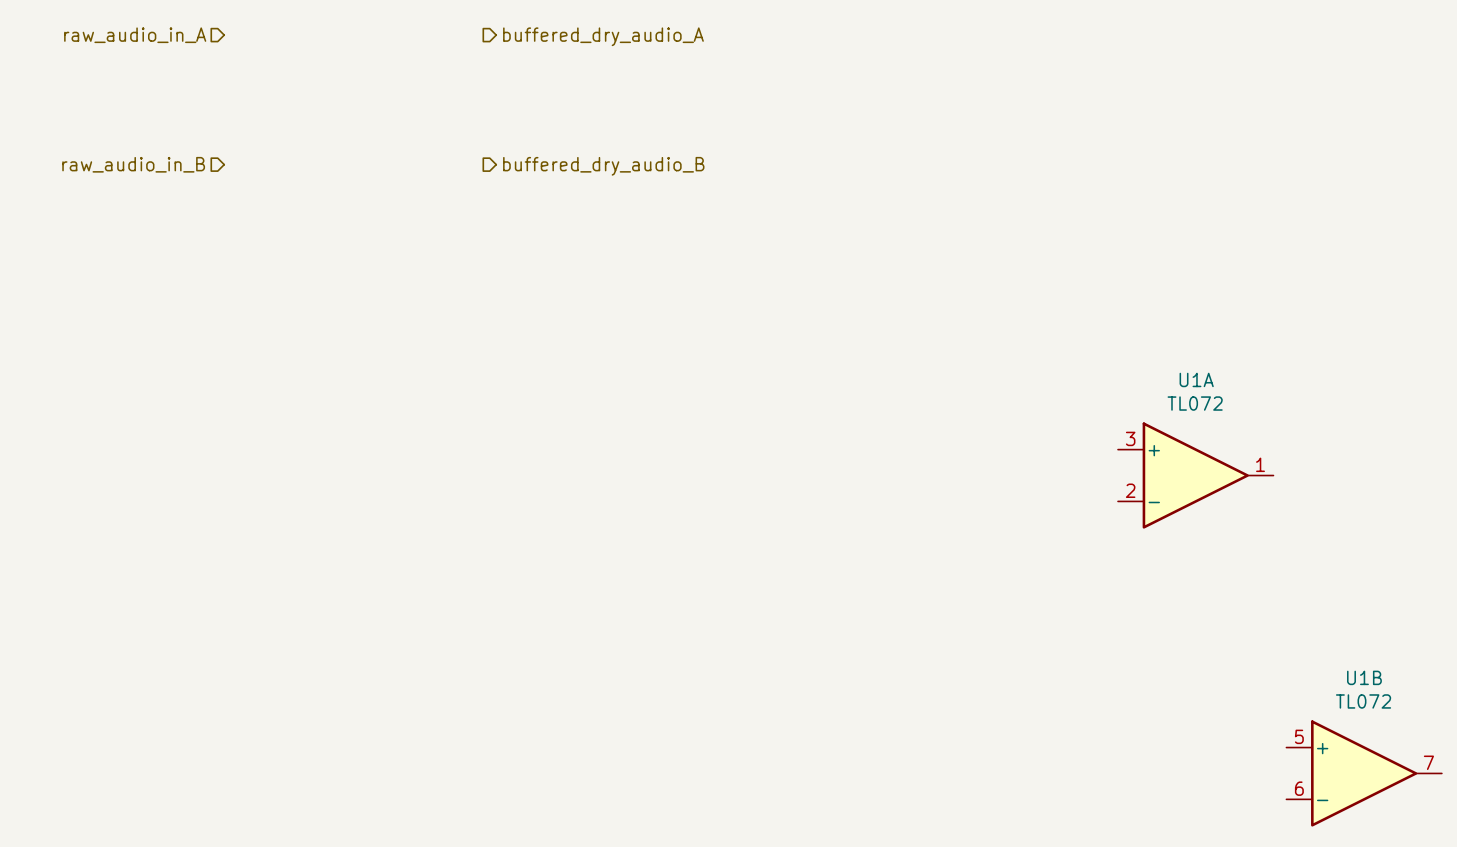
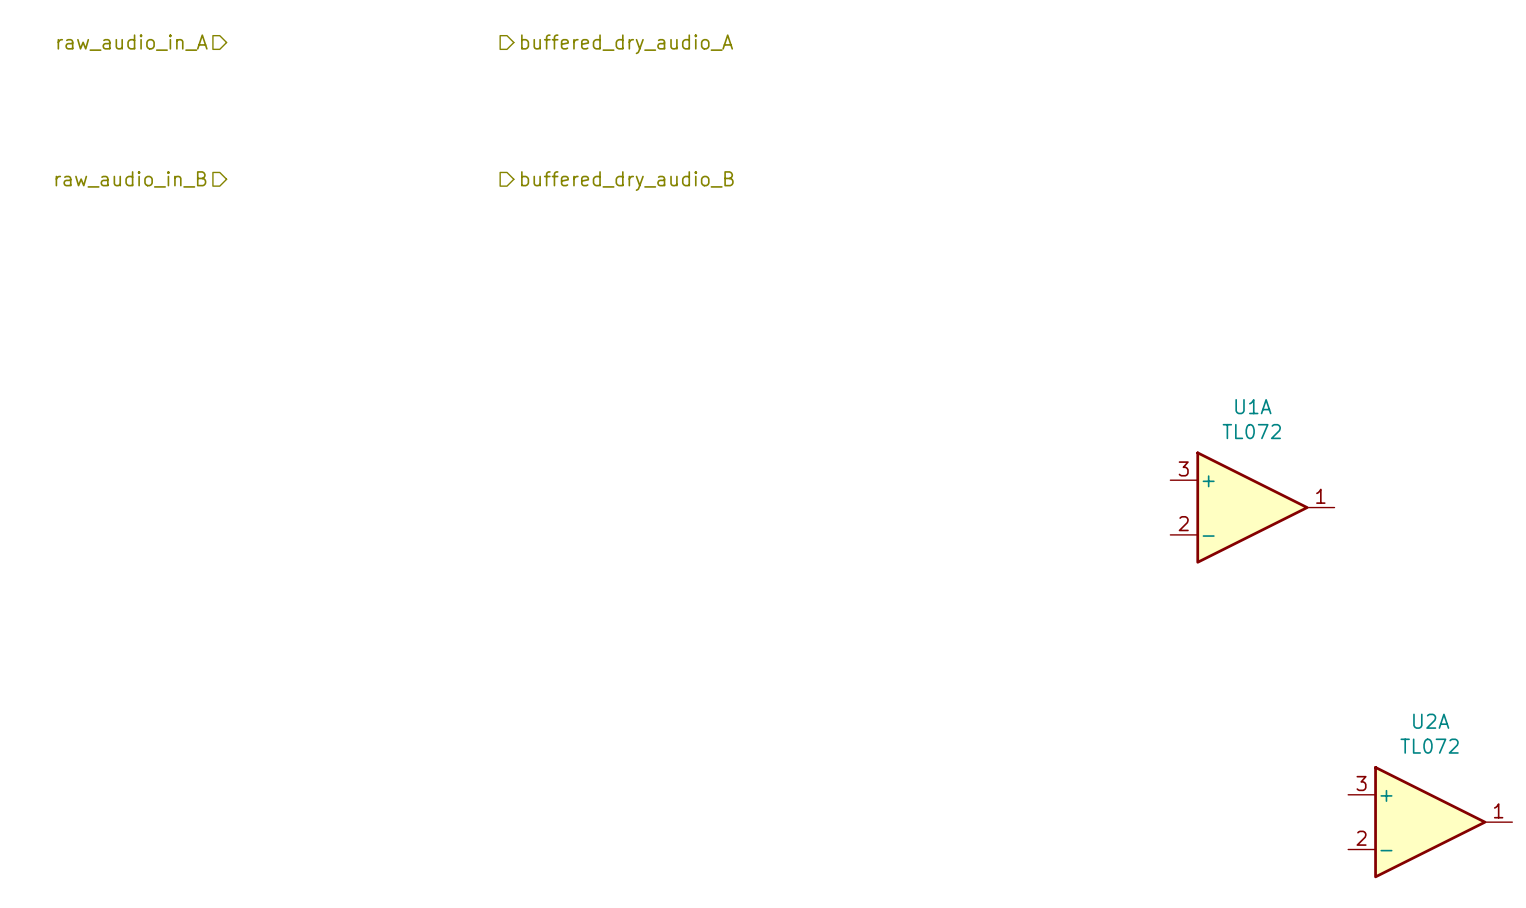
U1B name: U1B (1364, 677) -> U2A (1431, 721)
U1B pin number: 5 (1299, 736) -> 3 (1361, 783)
U1B pin number: 7 (1428, 762) -> 1 (1498, 810)
U1B pin number: 6 (1299, 788) -> 2 (1361, 838)

